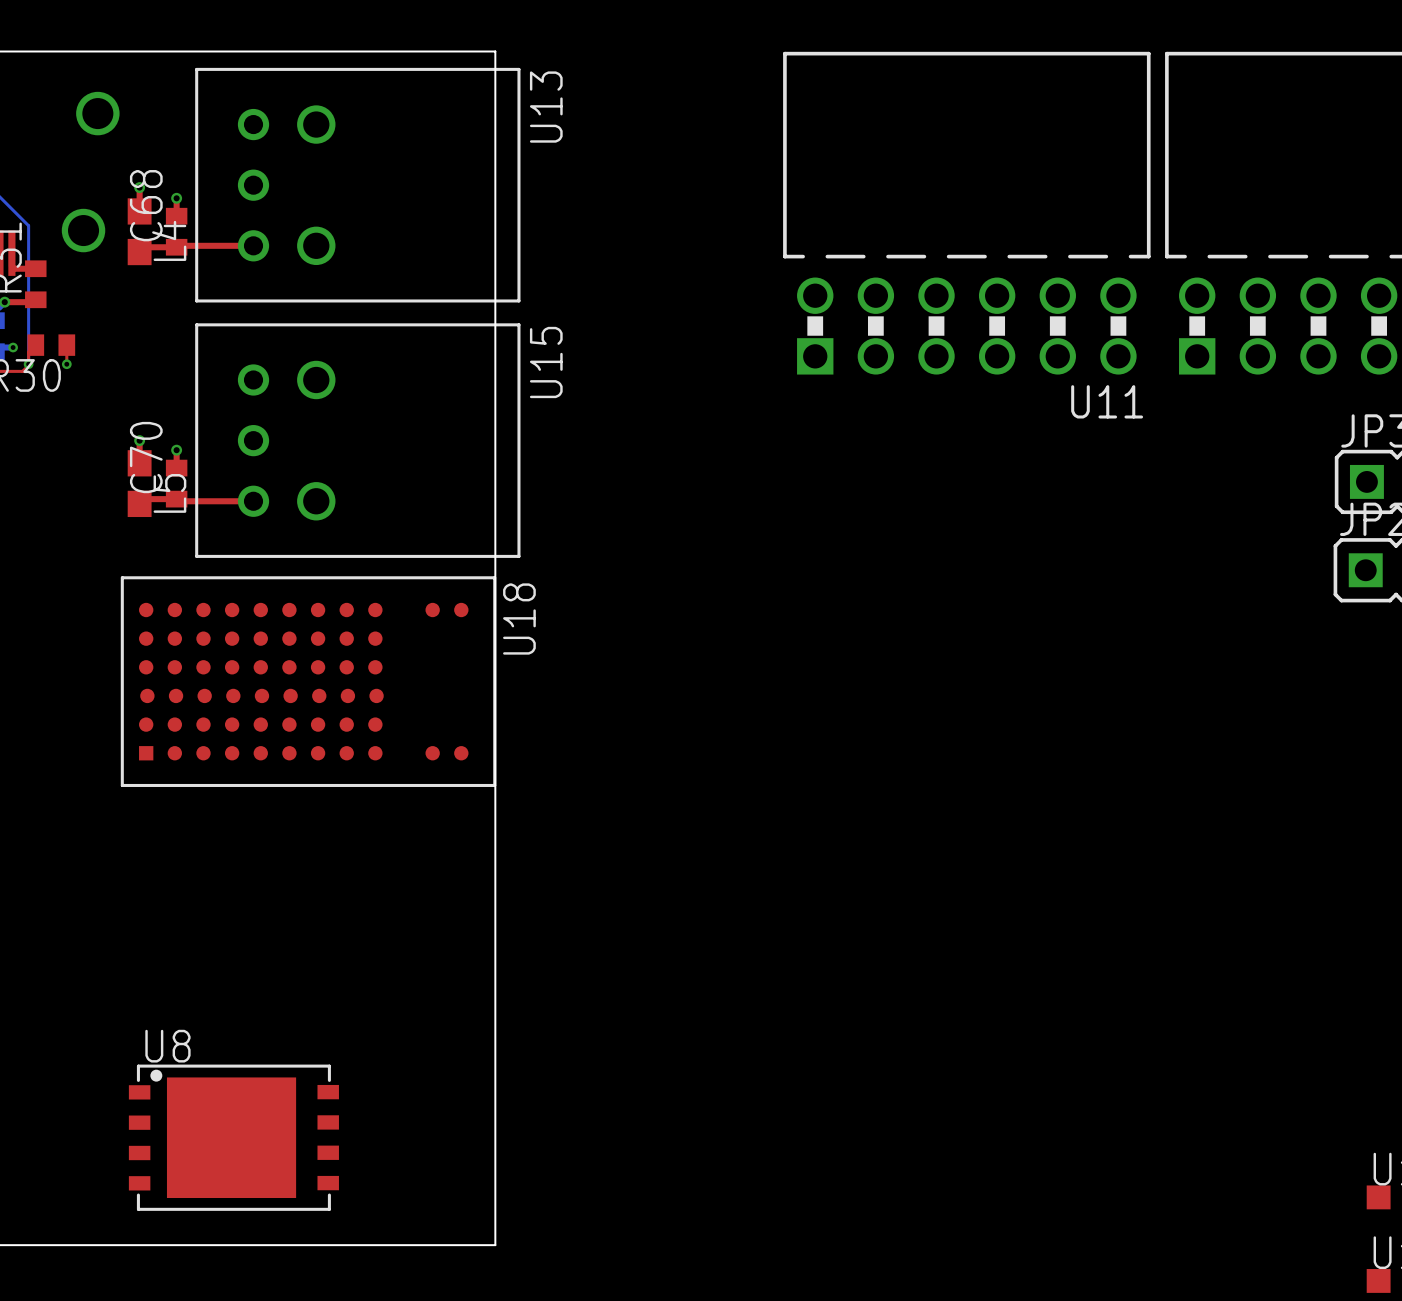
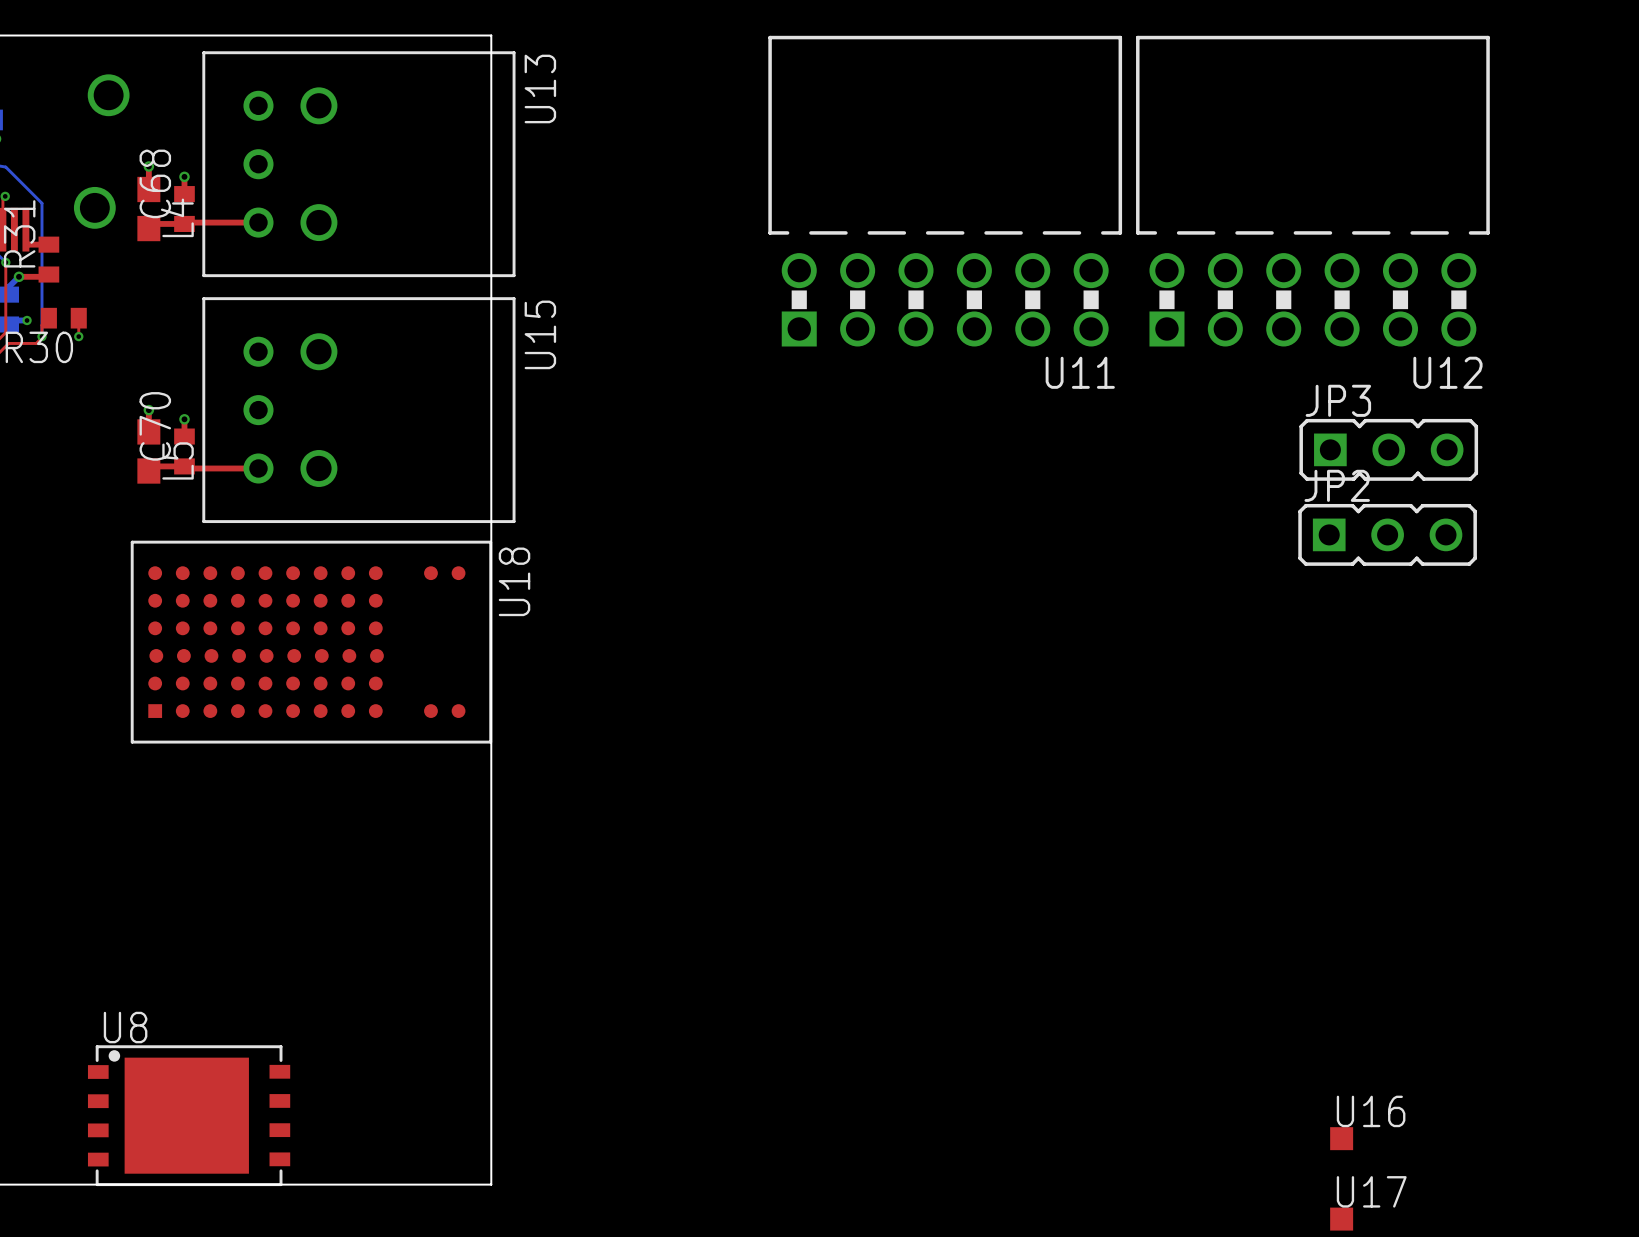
U8 position: (233, 1137) -> (189, 1115)

